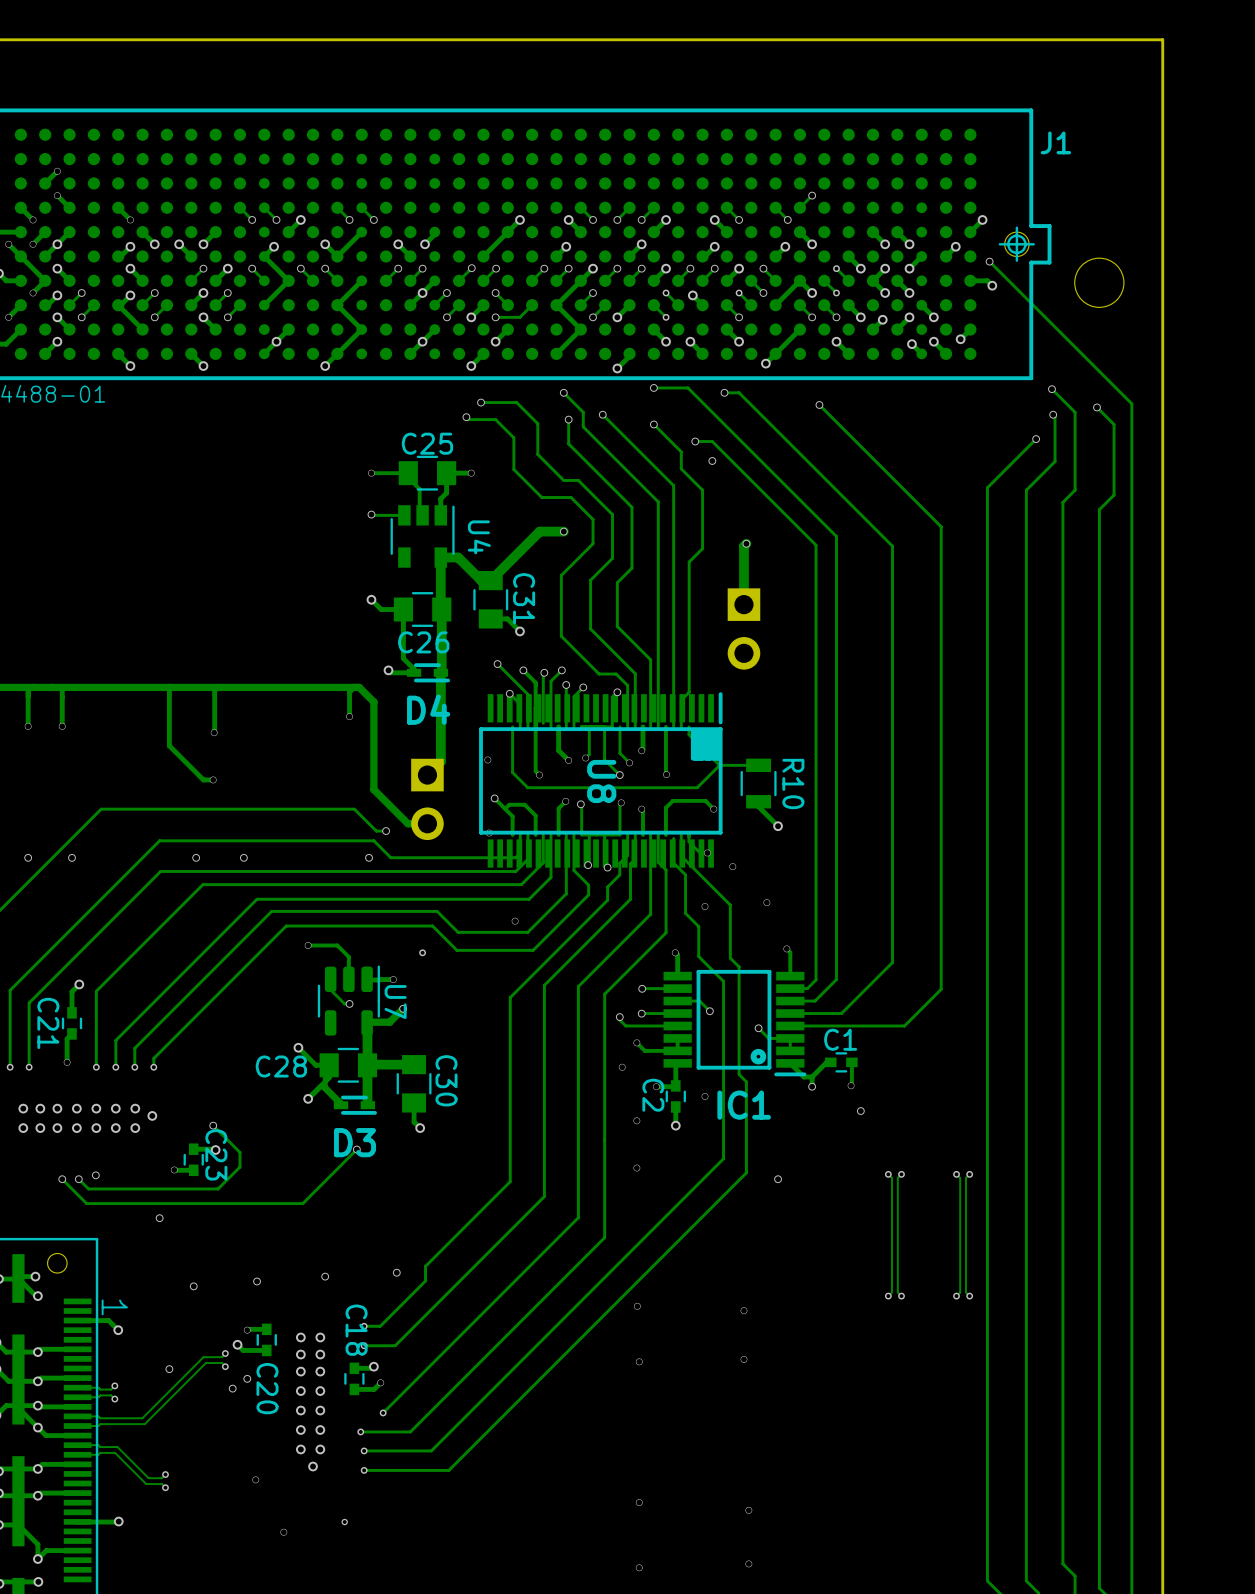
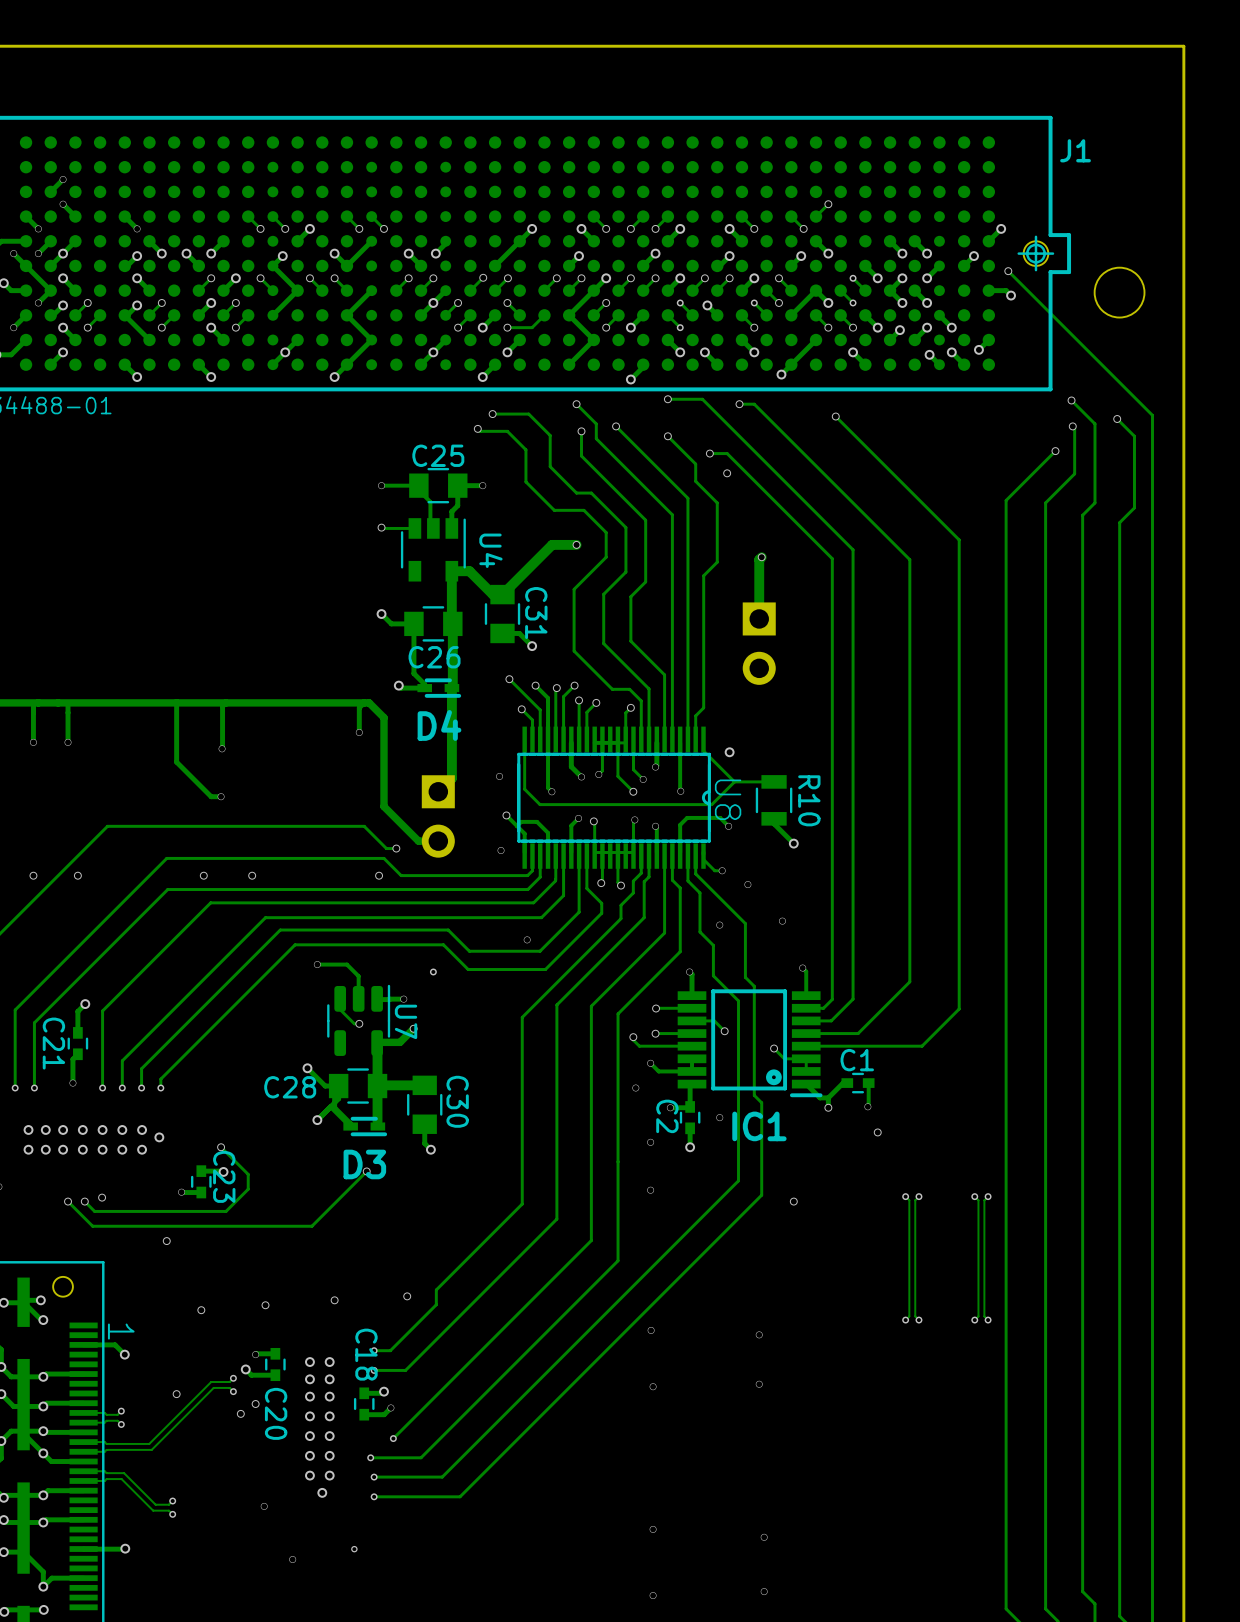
U8 footprint: [479, 692, 723, 868] -> [517, 726, 711, 869]
U8 name position: U8 (601, 781) -> U8 (728, 799)

